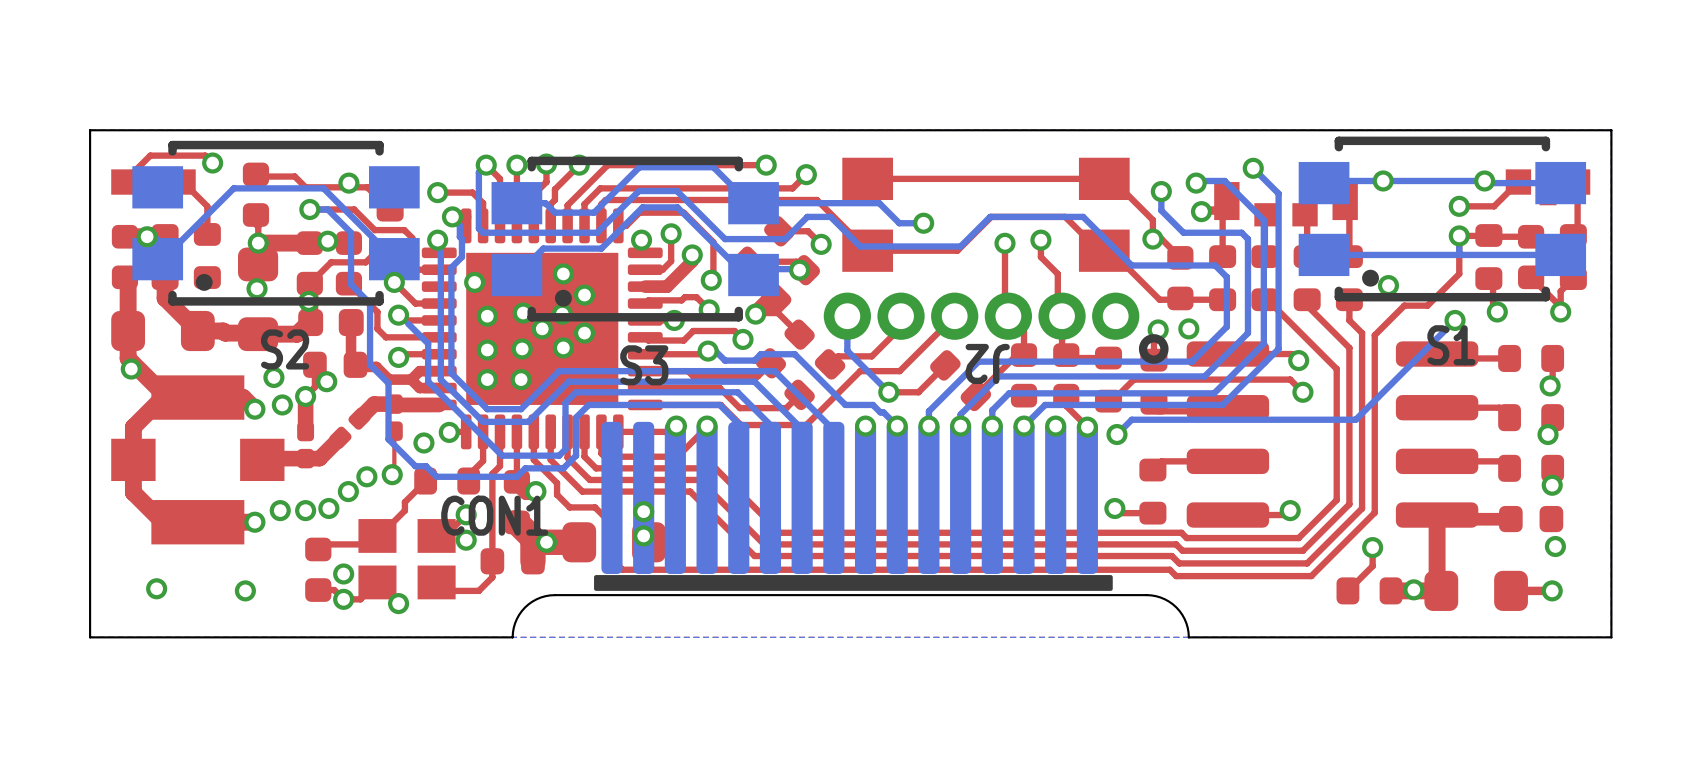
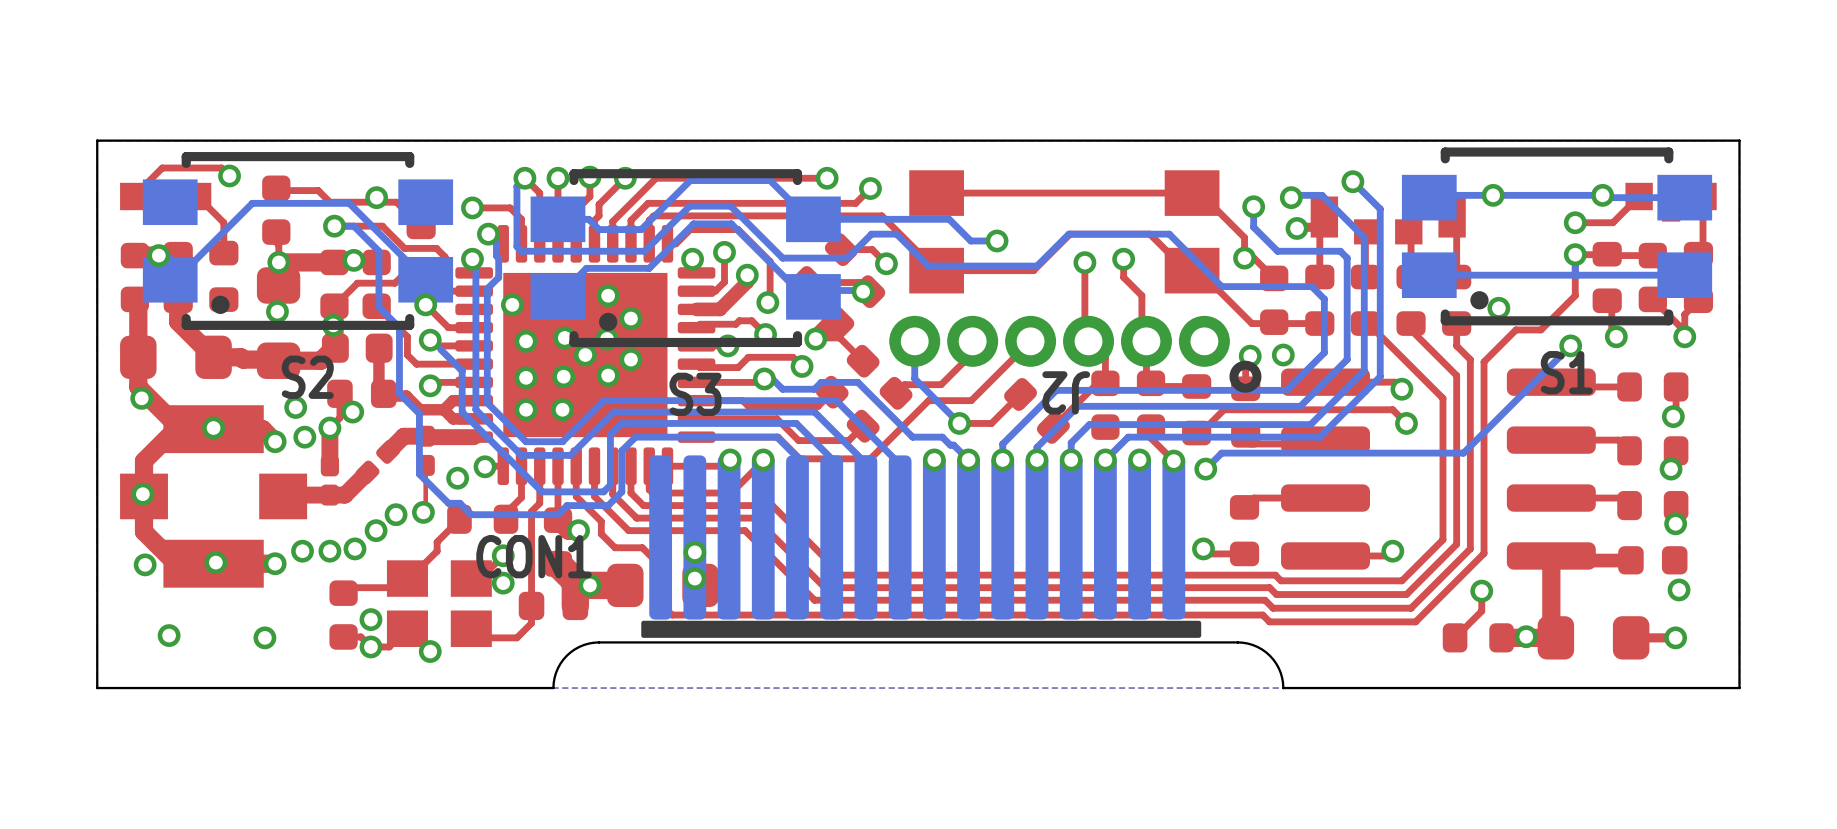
via: none -> (213, 428)
via: none -> (142, 494)
via: none -> (215, 562)
via: none -> (145, 564)

